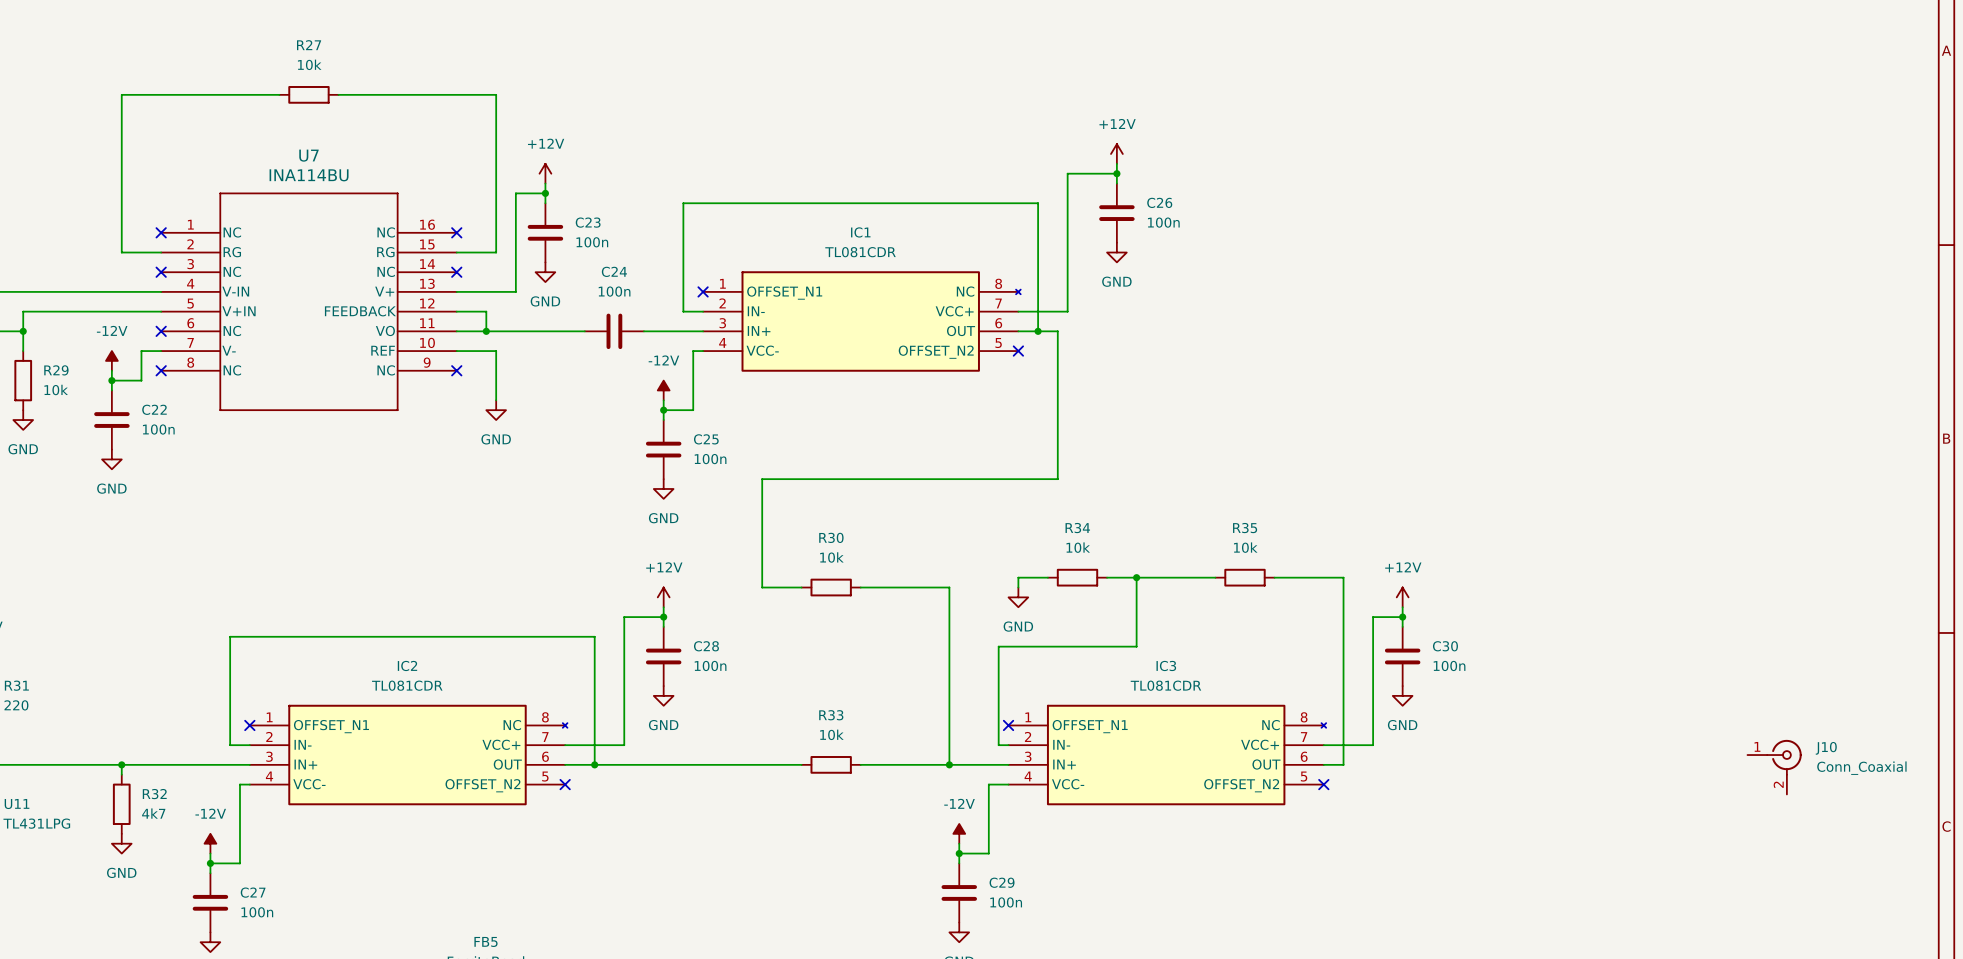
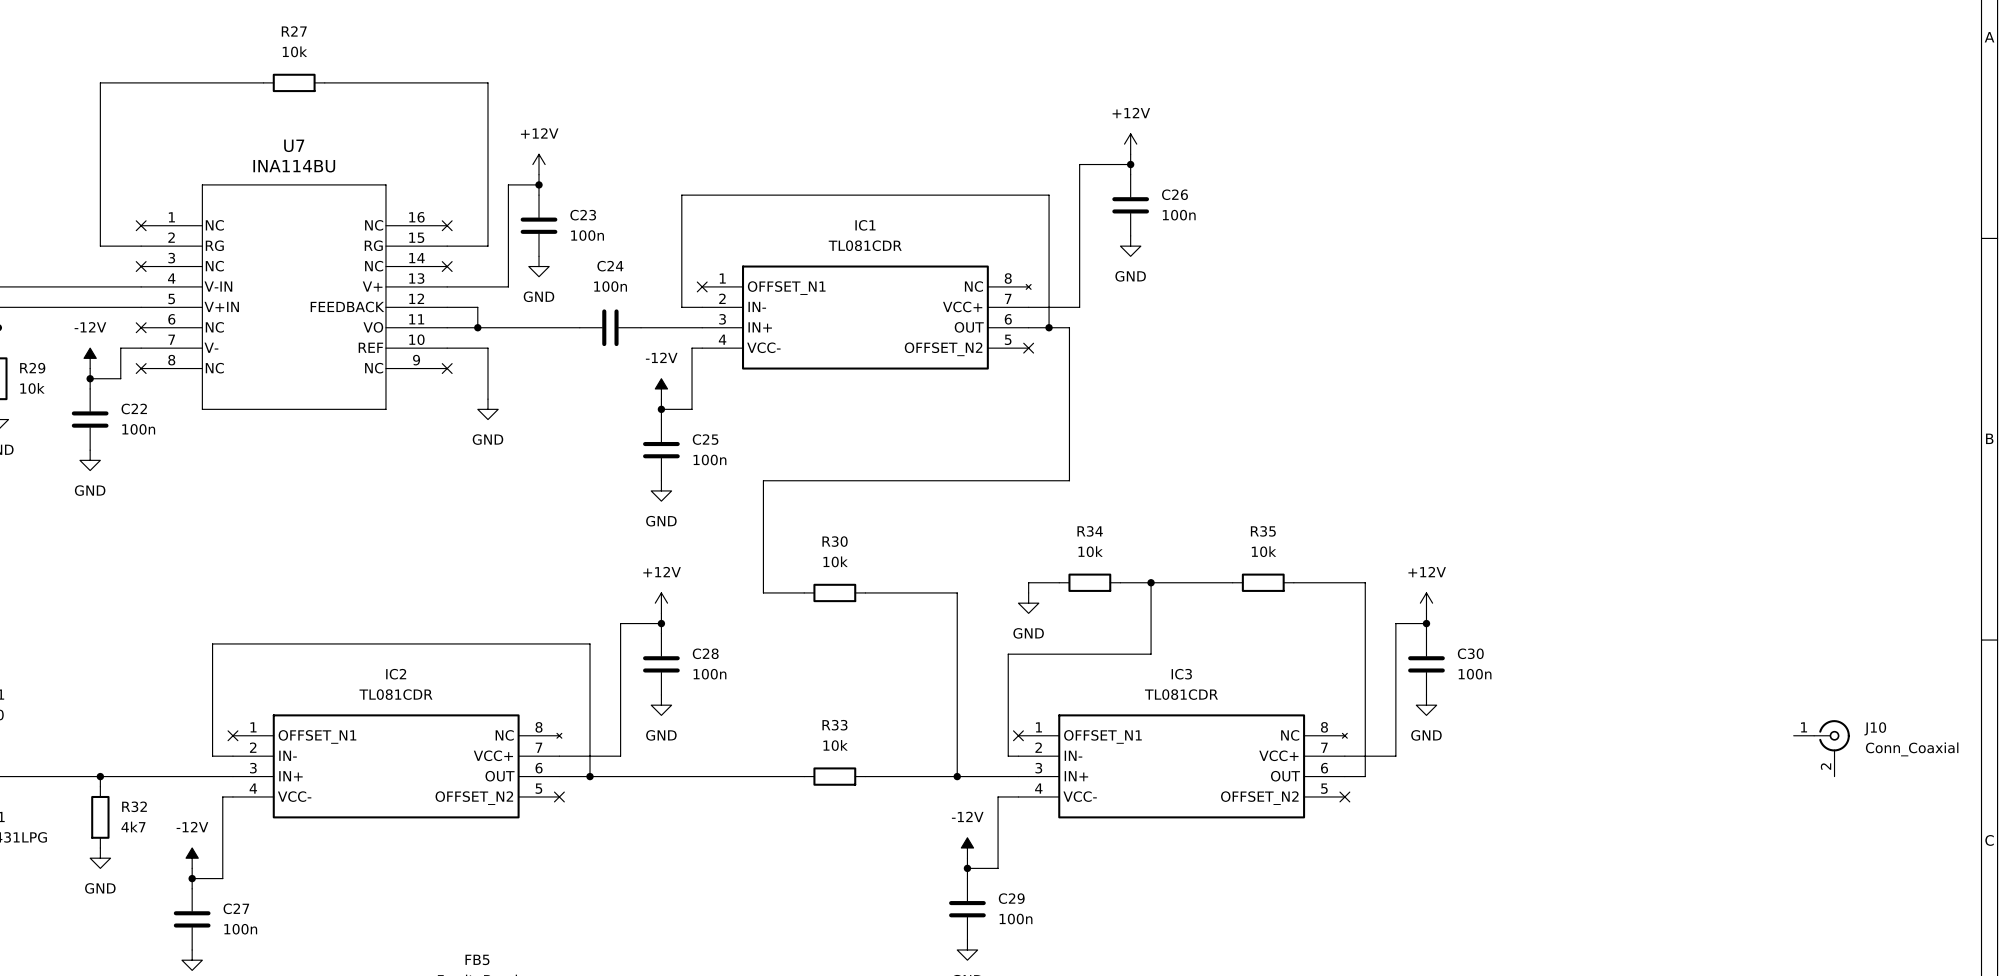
J10 position: (1774, 767) -> (1821, 748)

